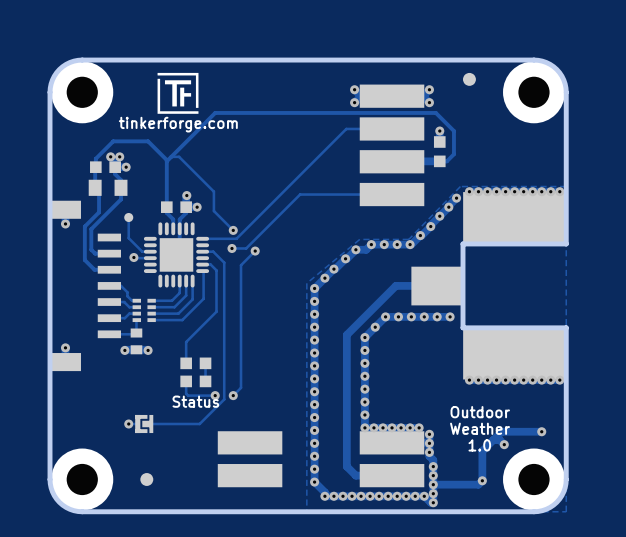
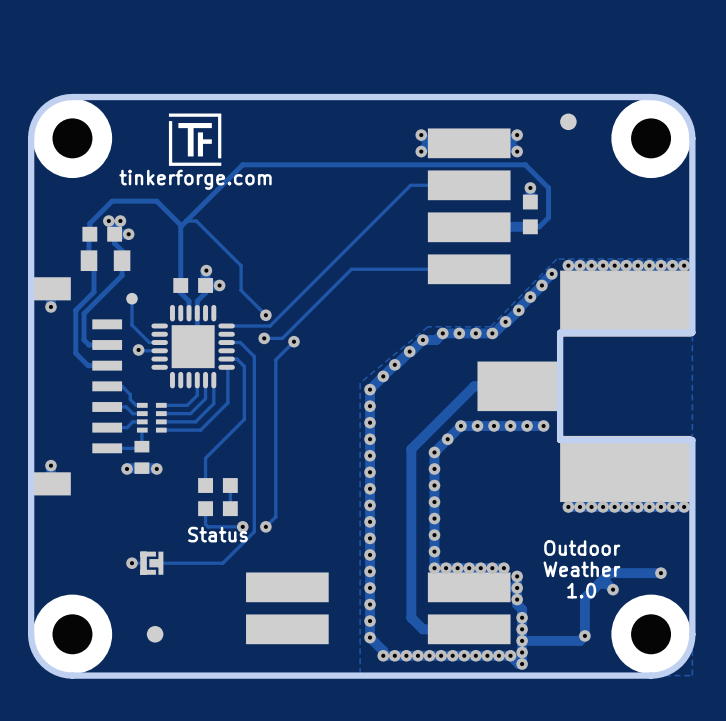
part footprint: [411, 192, 567, 380] -> [477, 270, 693, 503]

